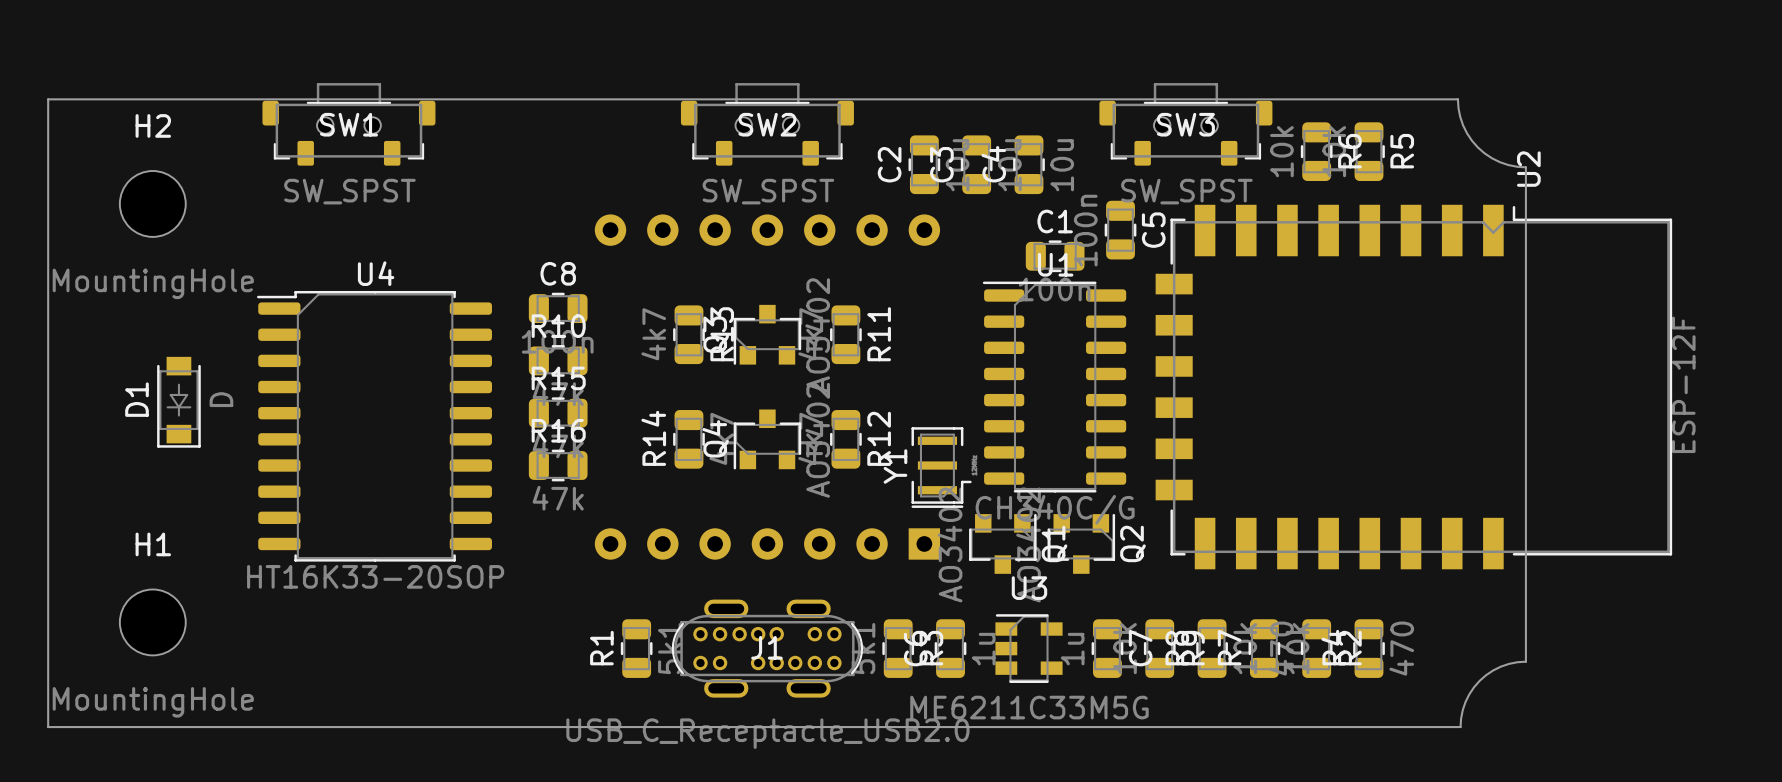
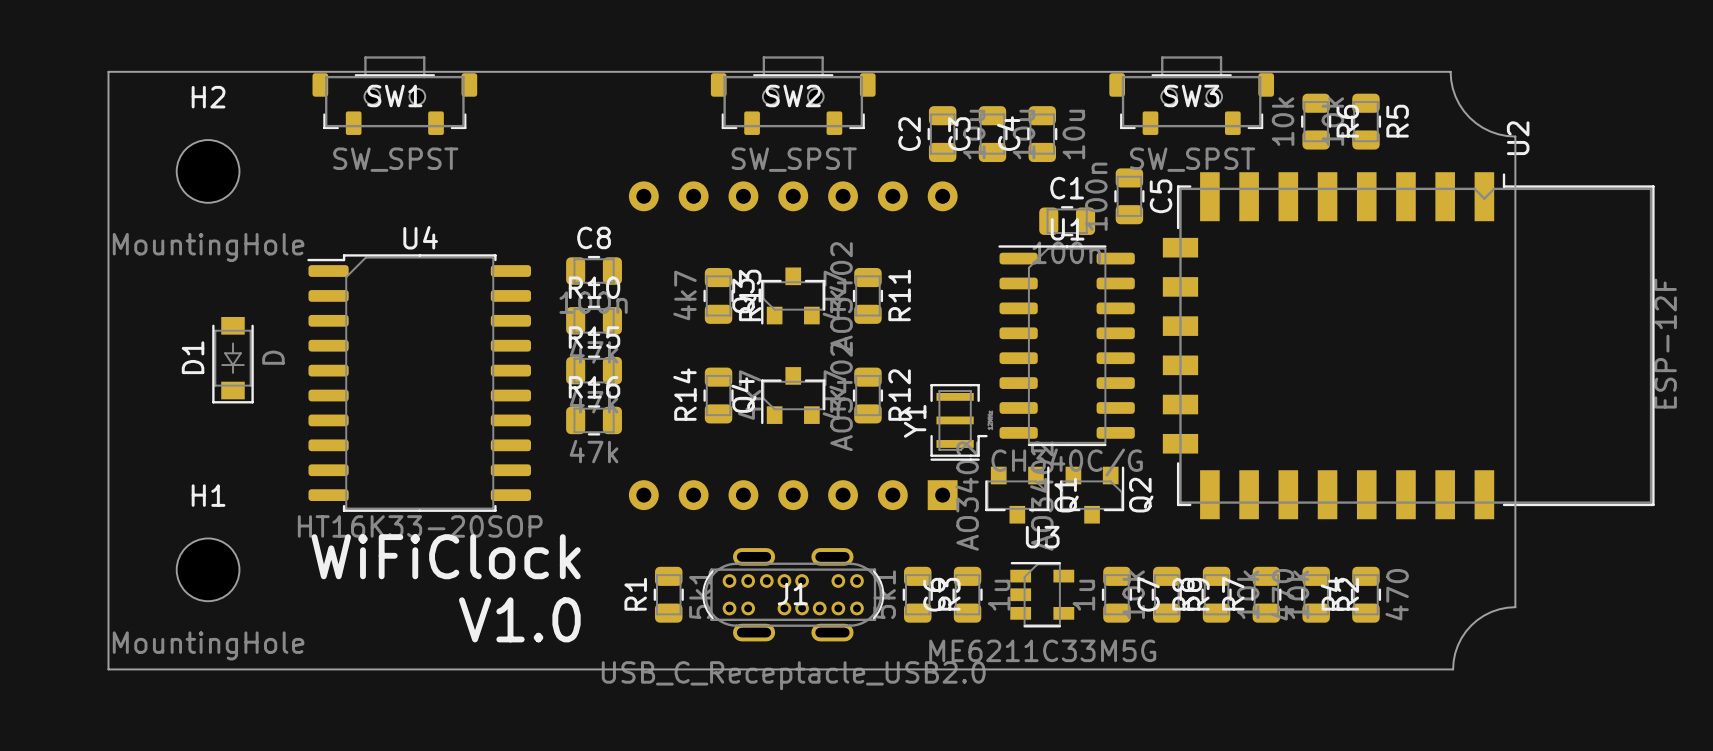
text: none -> WiFiClock (446, 556)
text: none -> V1.0 (519, 619)

